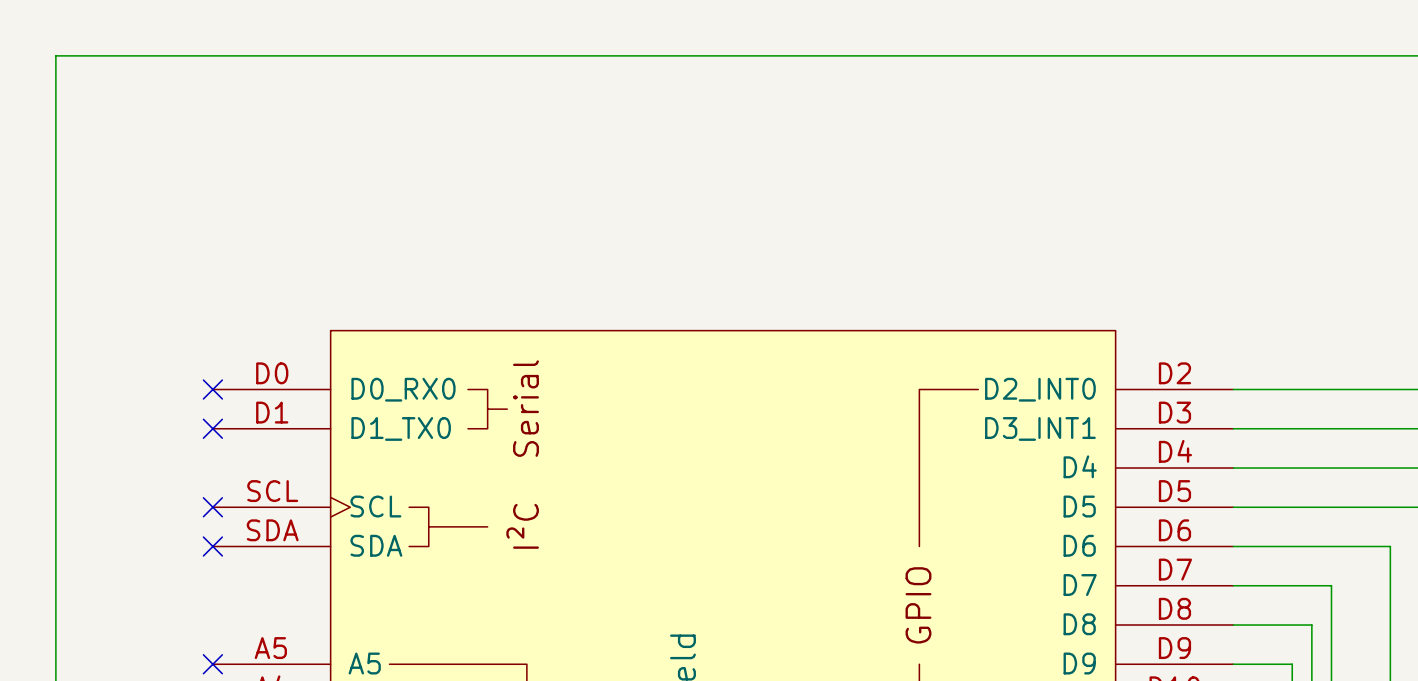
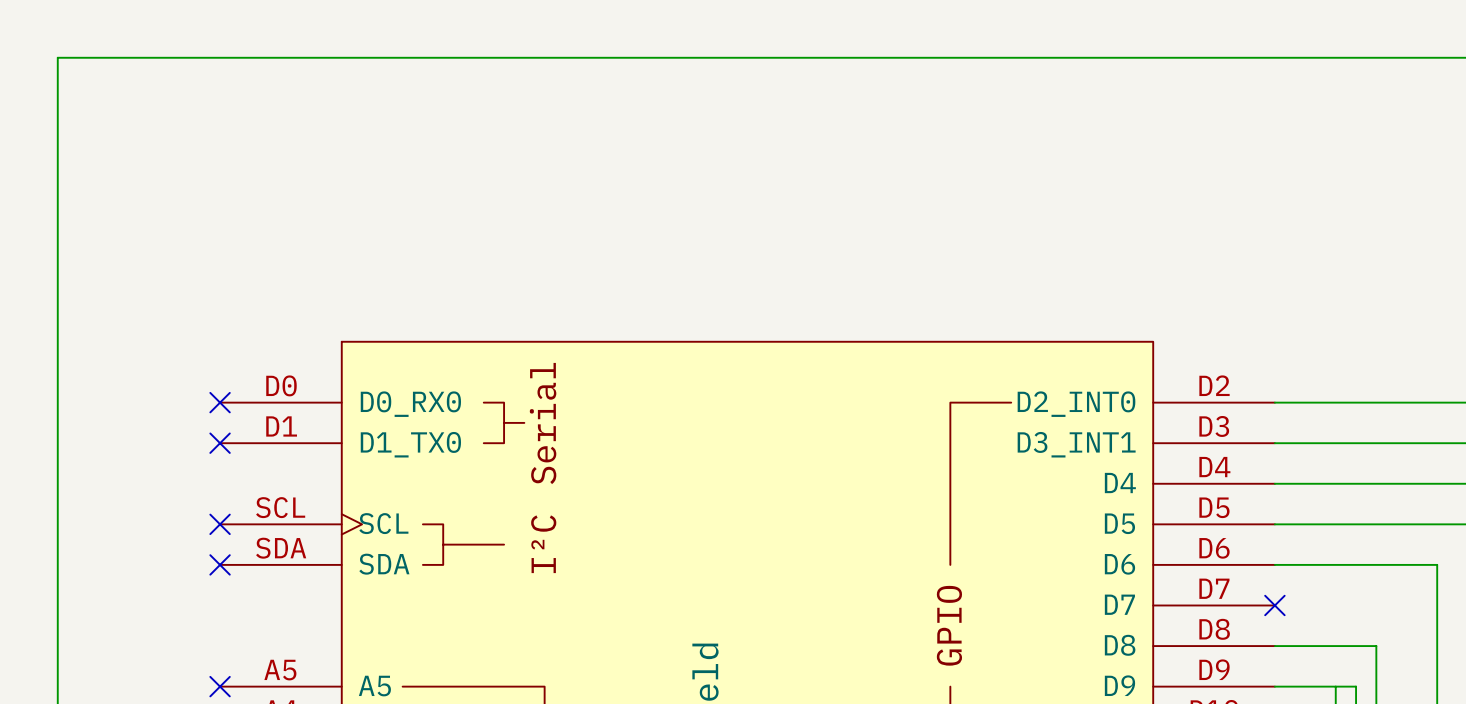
wire: (1233, 585) (1331, 585) (1331, 625) -> none
no-connect mark: none -> (1274, 605)
wire: (1311, 625) (1311, 664) -> (1356, 646) (1376, 646)
wire: none -> (1335, 686) (1356, 686)

